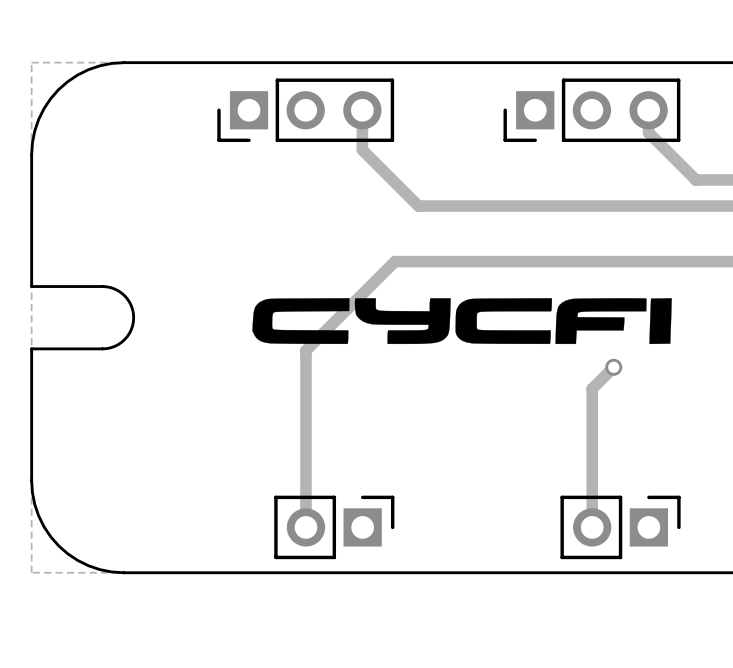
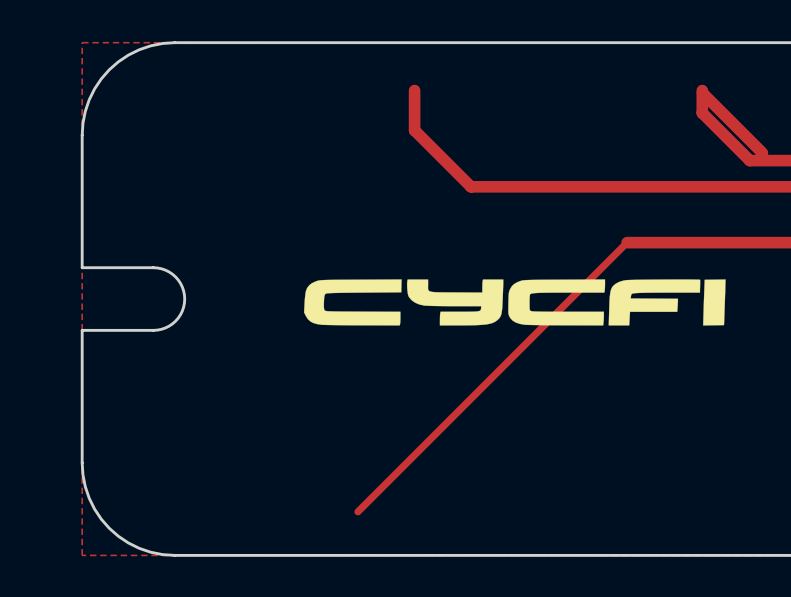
part: (305, 110) -> none
part: (591, 110) -> none
track: none -> (702, 93) (762, 152)
track: (573, 261) (394, 261) (305, 350) (305, 527) -> (627, 242) (357, 511)
track: (613, 367) (592, 388) (592, 527) -> none
via: (613, 367) -> none
part: (334, 527) -> none
part: (620, 527) -> none

